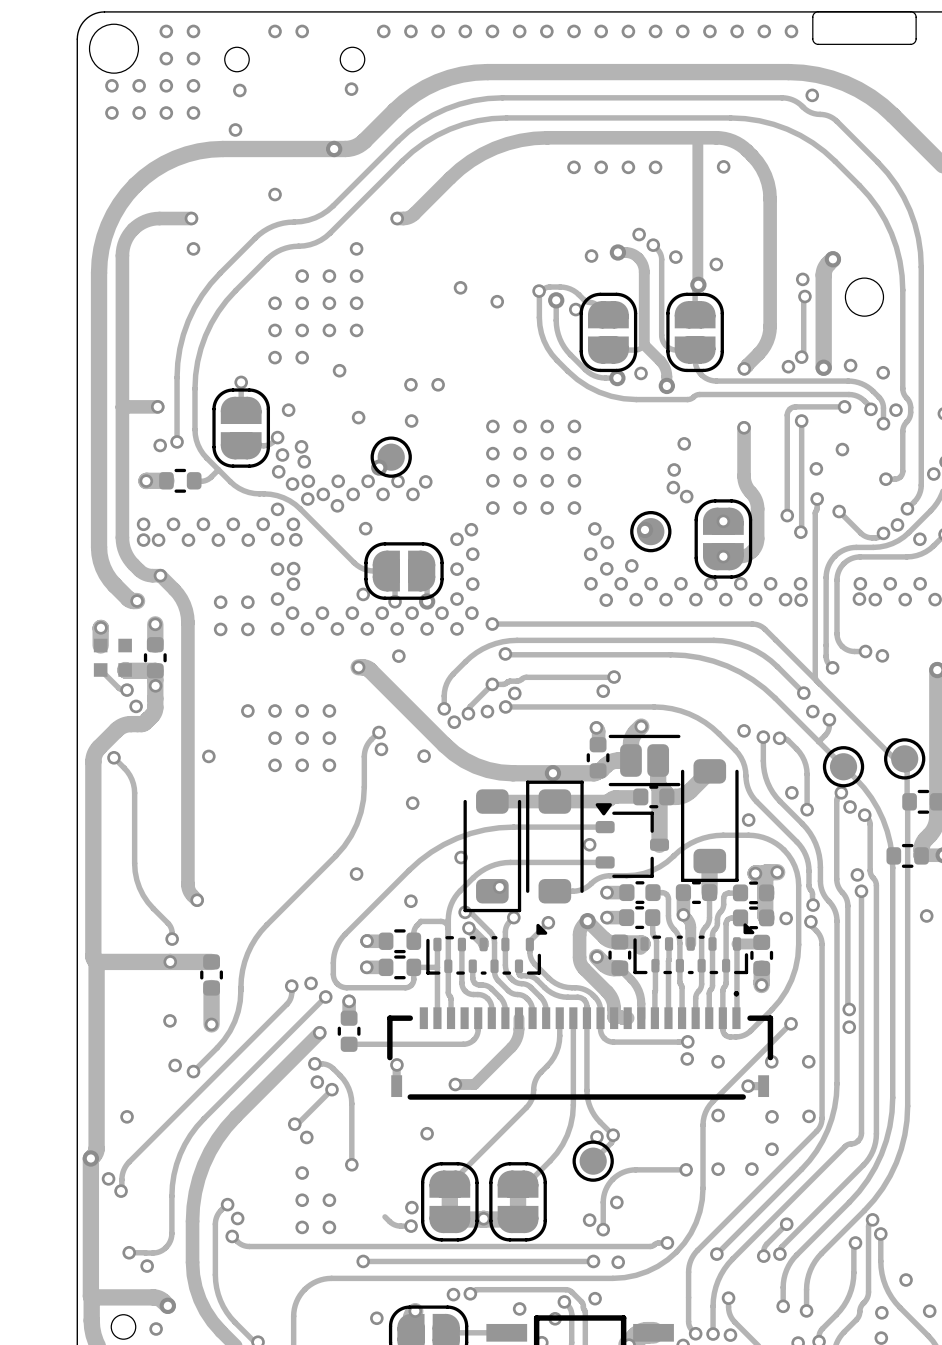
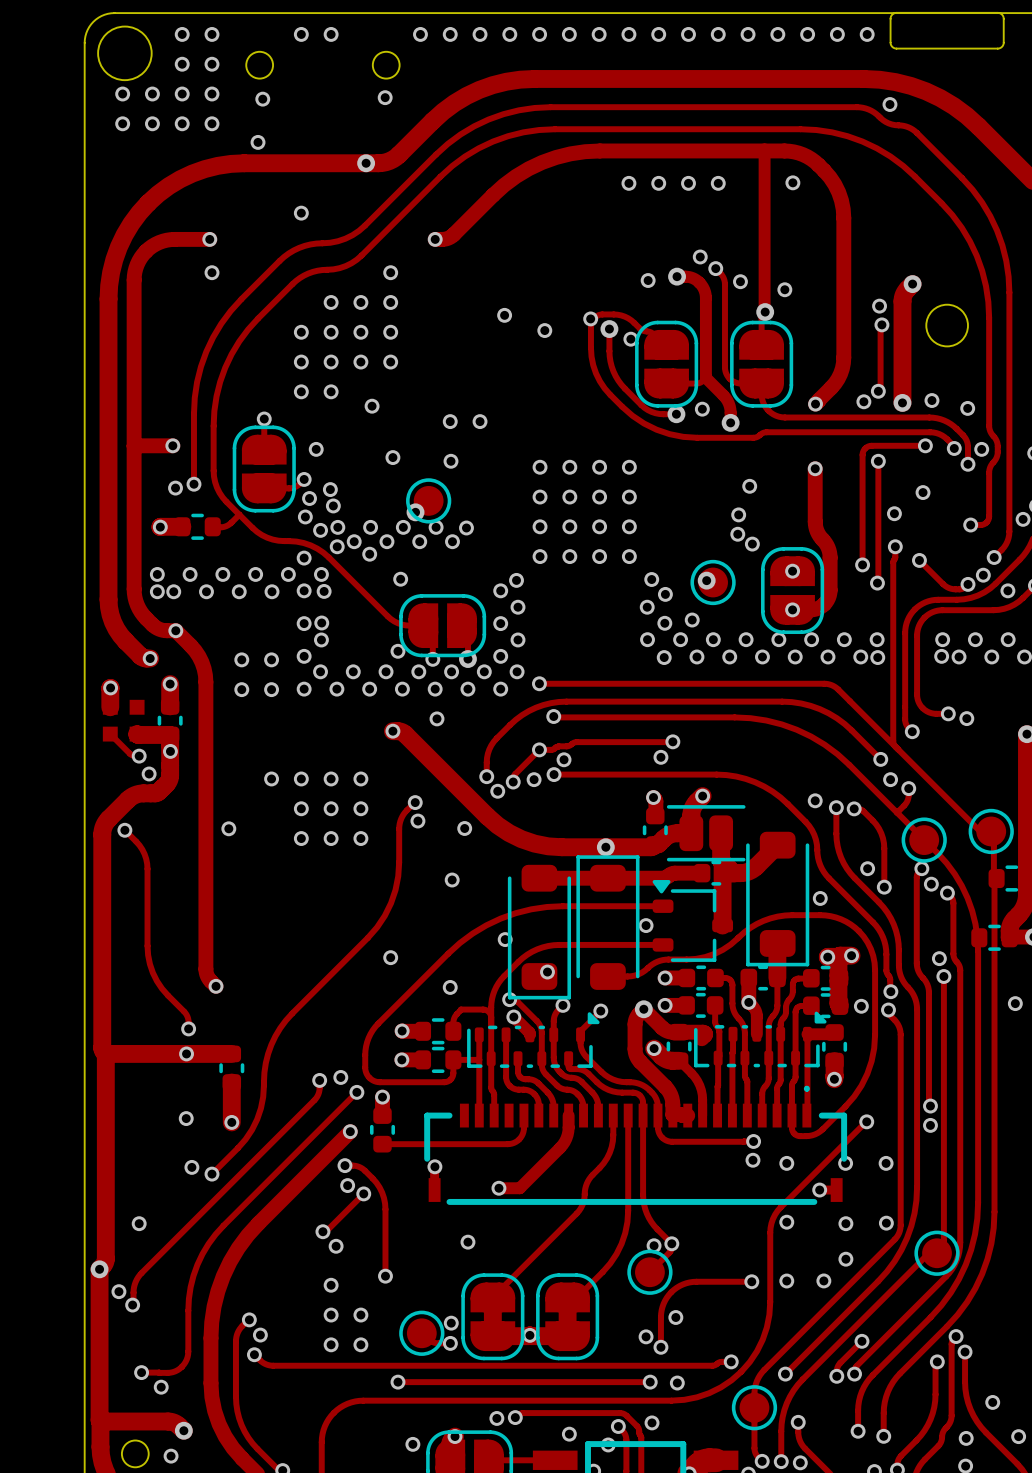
part: none -> (937, 1253)
part: none -> (421, 1333)
part: none -> (754, 1407)

